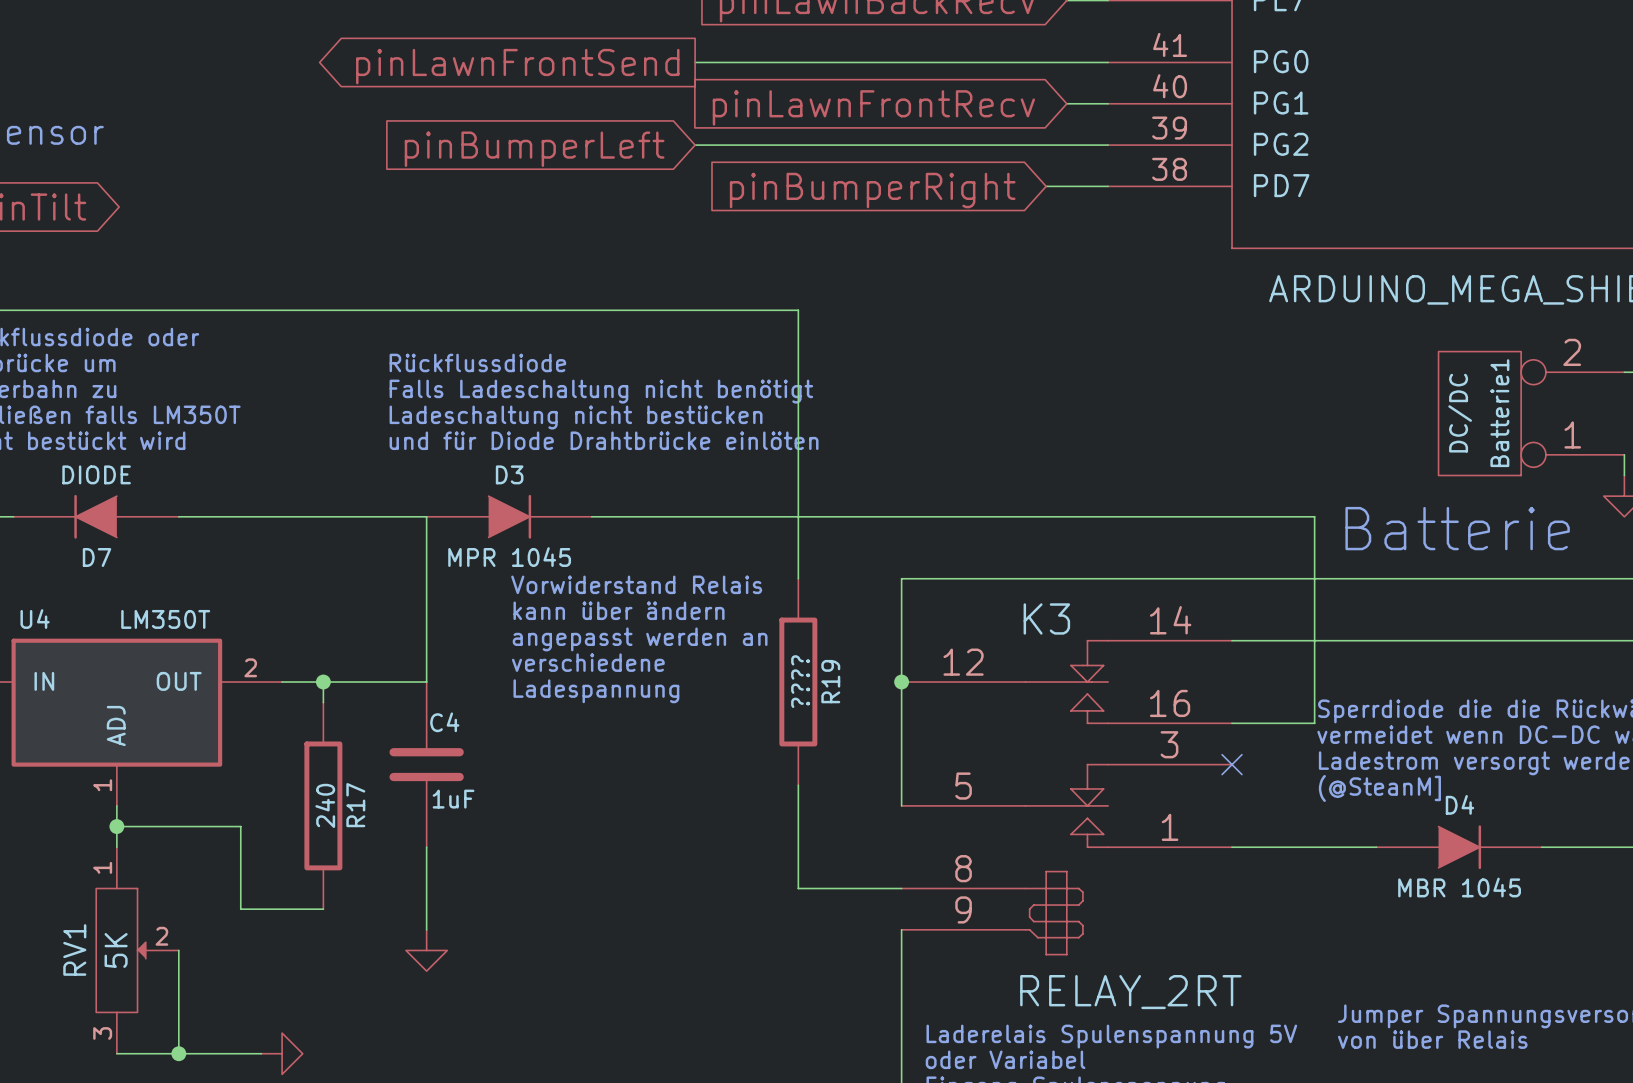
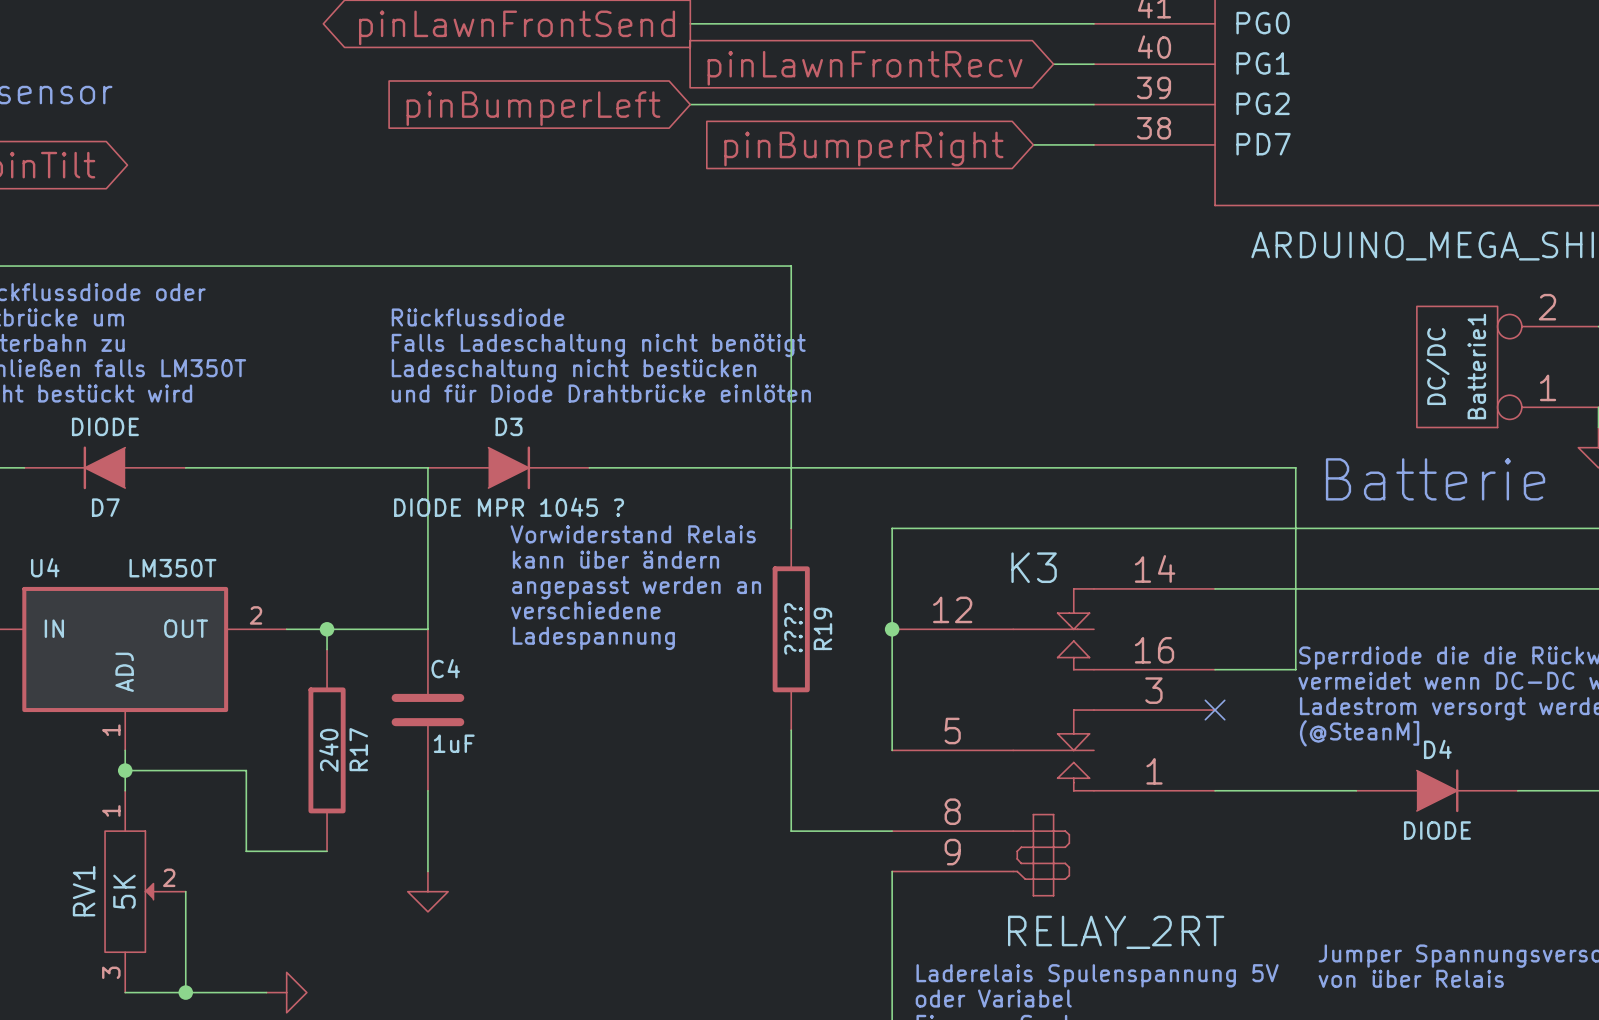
D3 value: MPR 1045 (509, 557) -> DIODE MPR 1045 ? (509, 507)
D4 value: MBR 1045 (1459, 887) -> DIODE (1437, 830)

